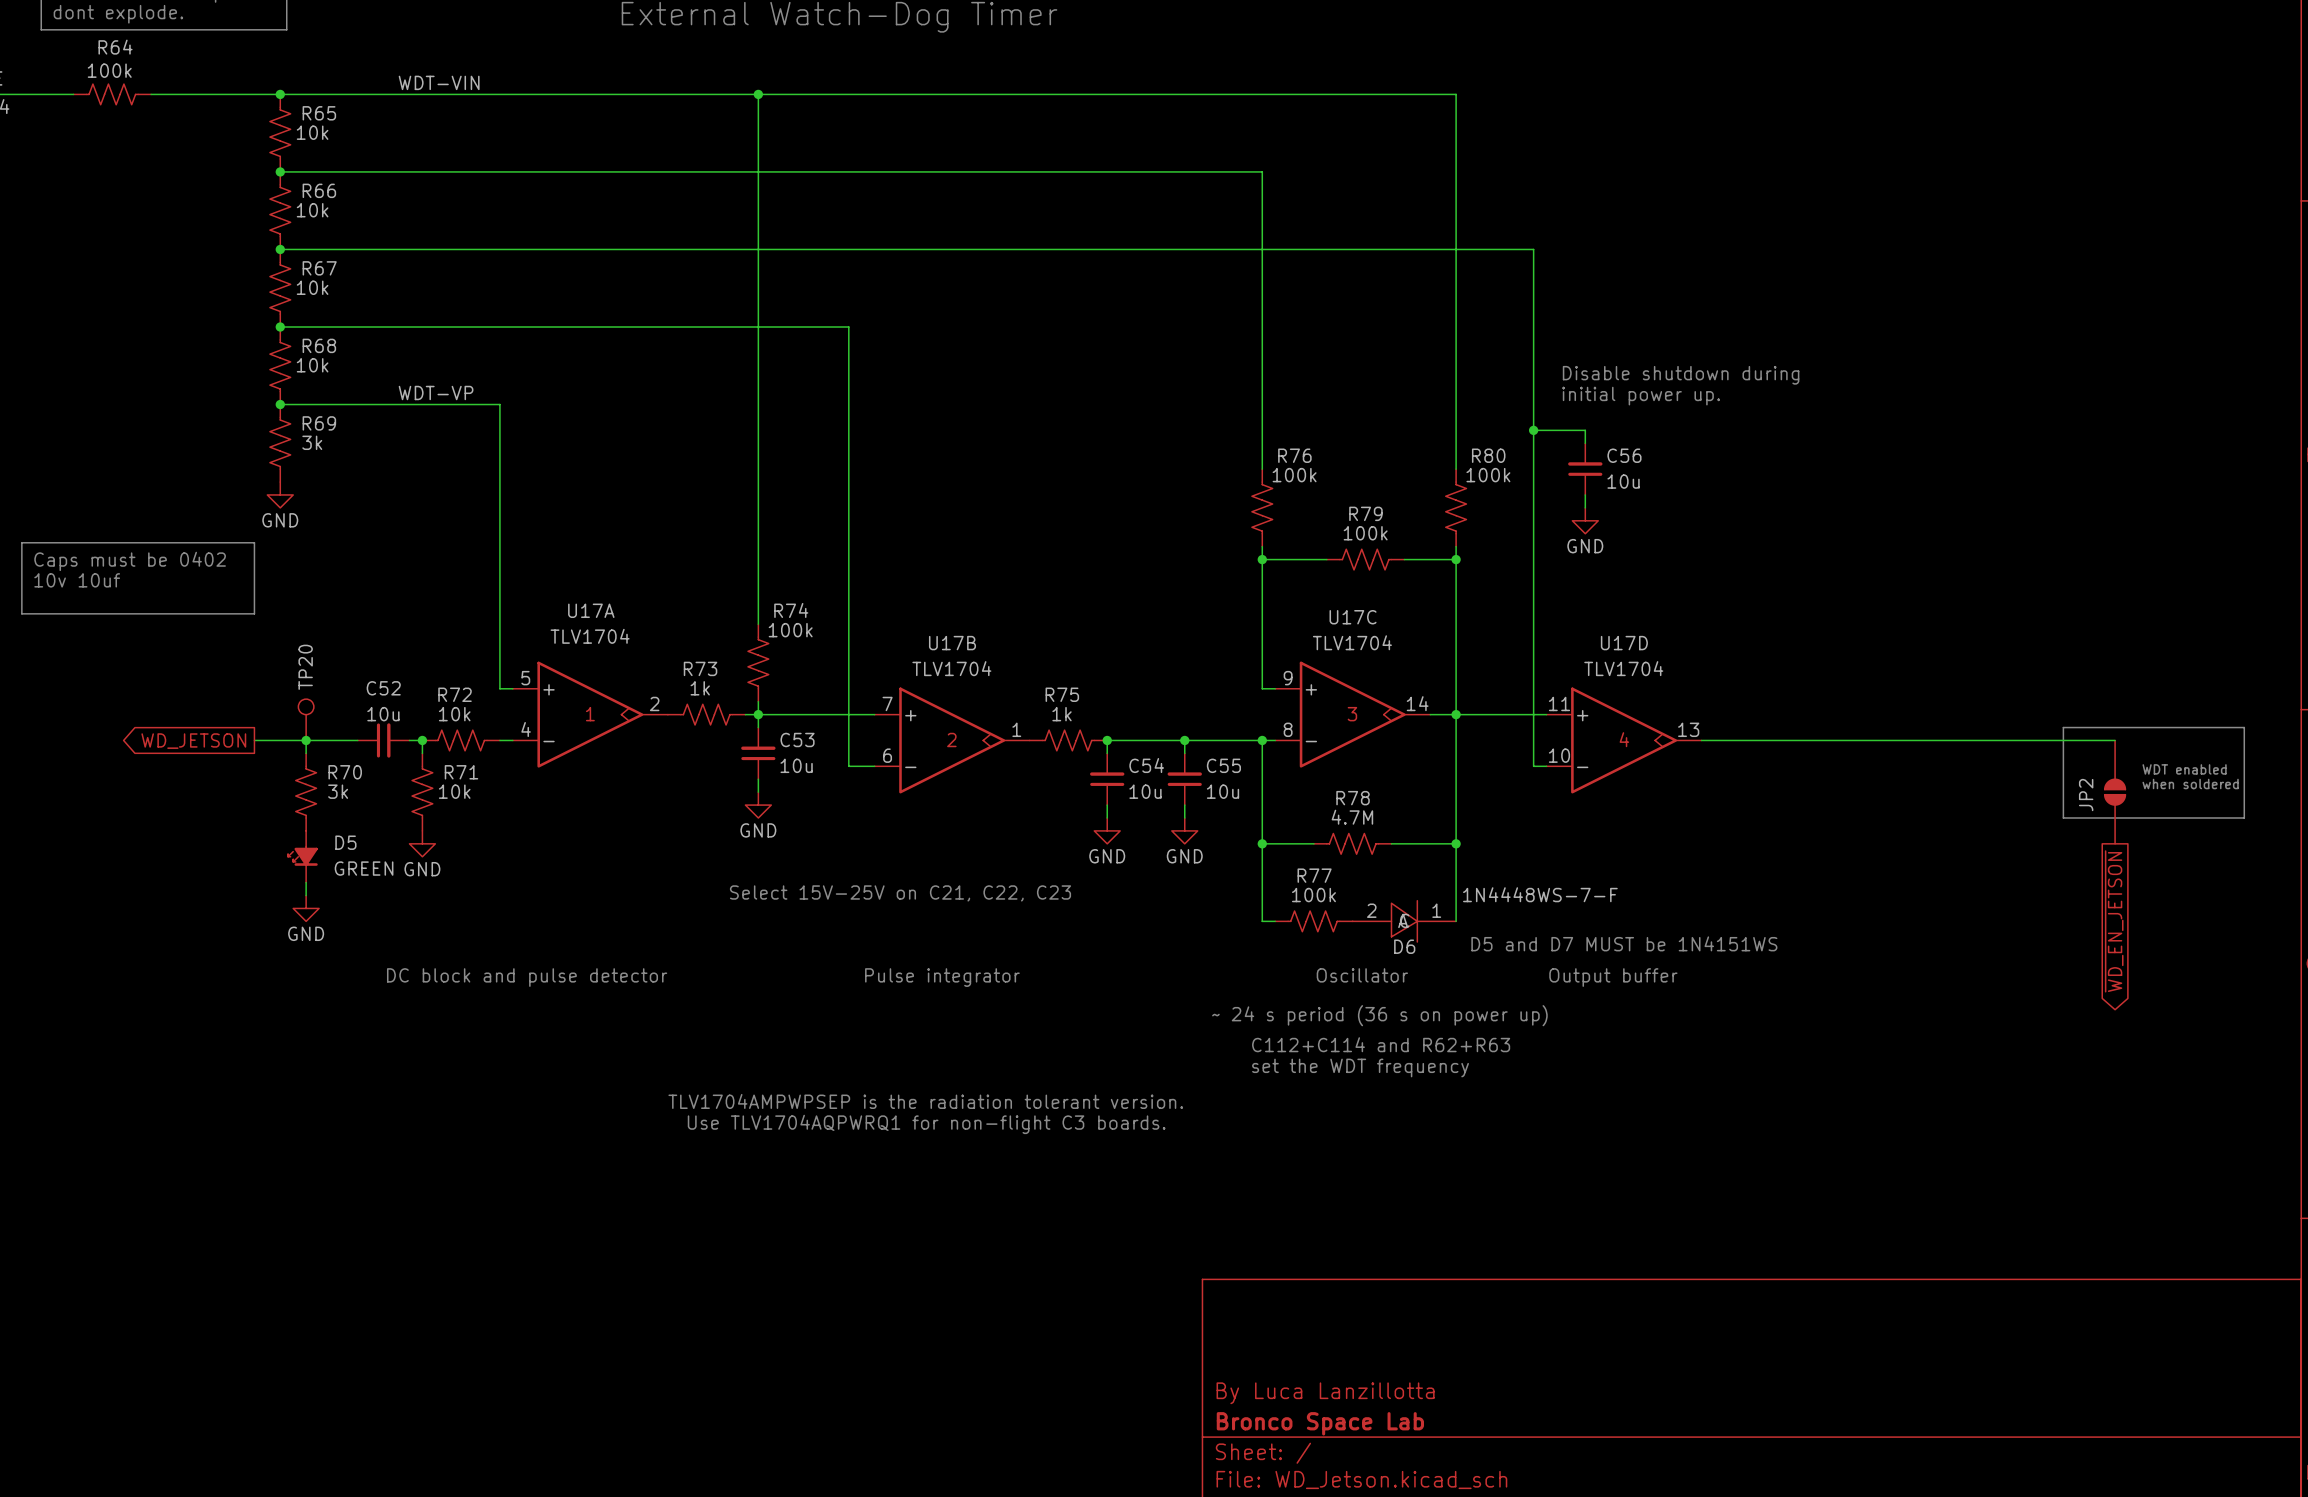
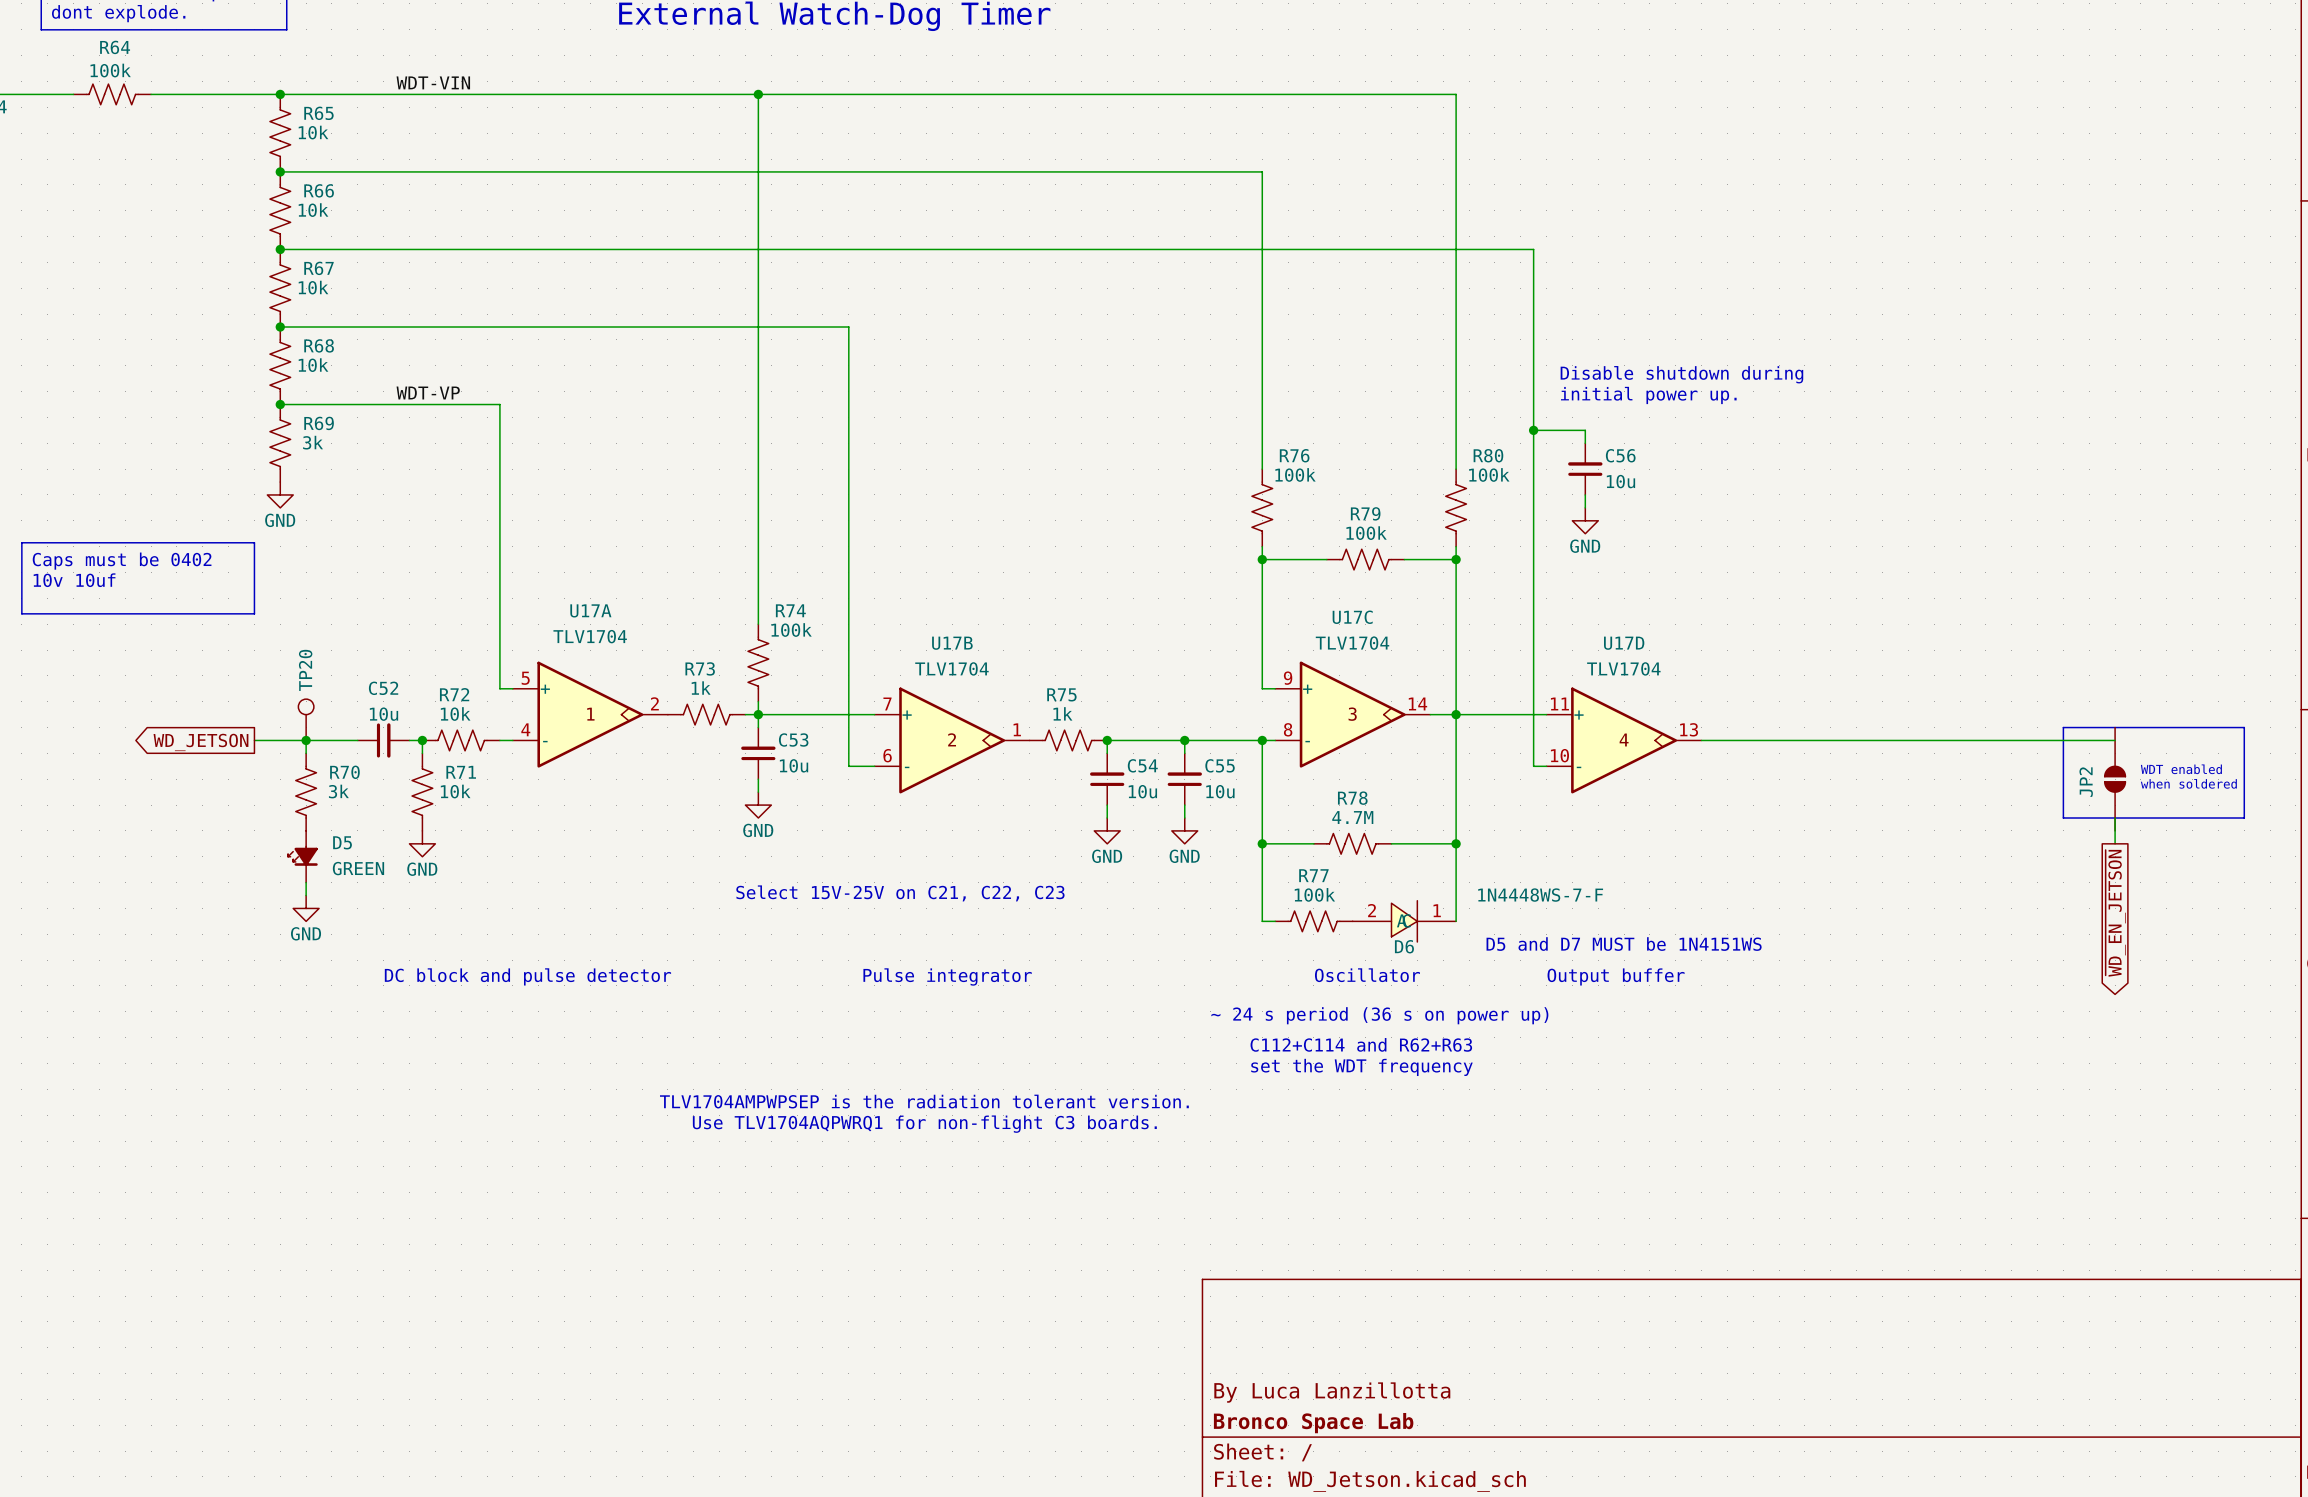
JP2 position: (2115, 792) -> (2115, 779)

